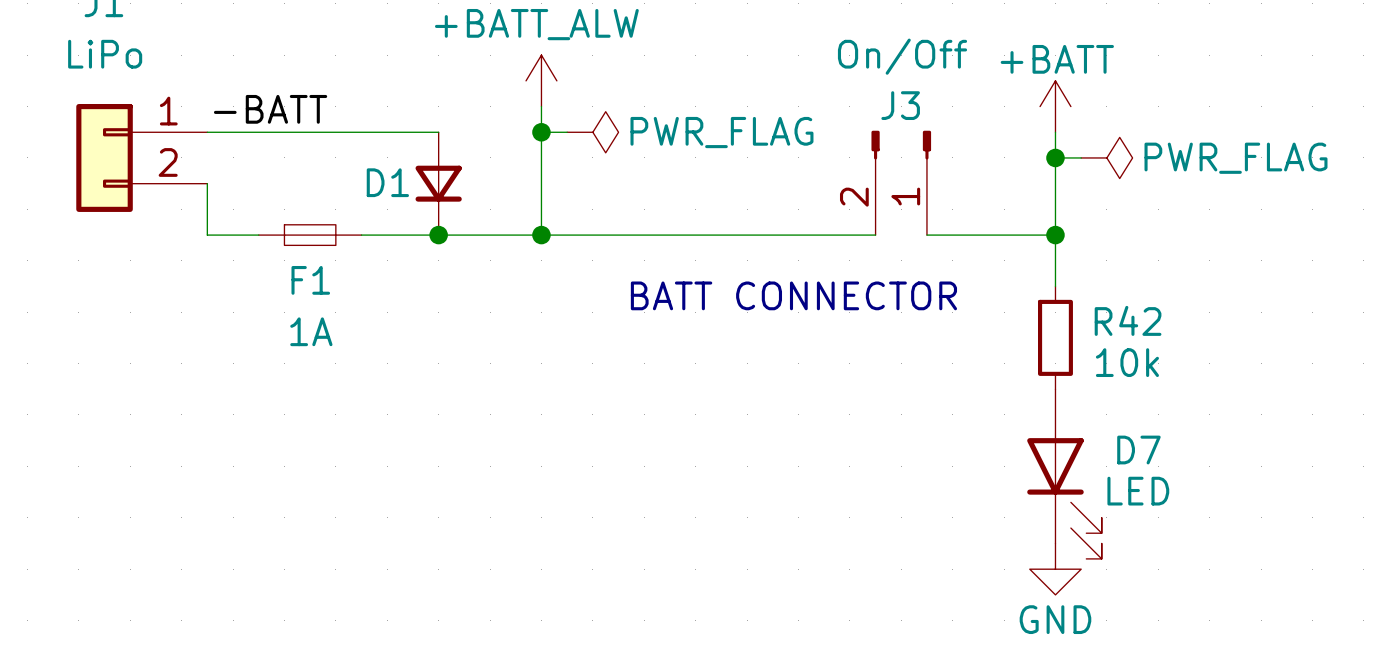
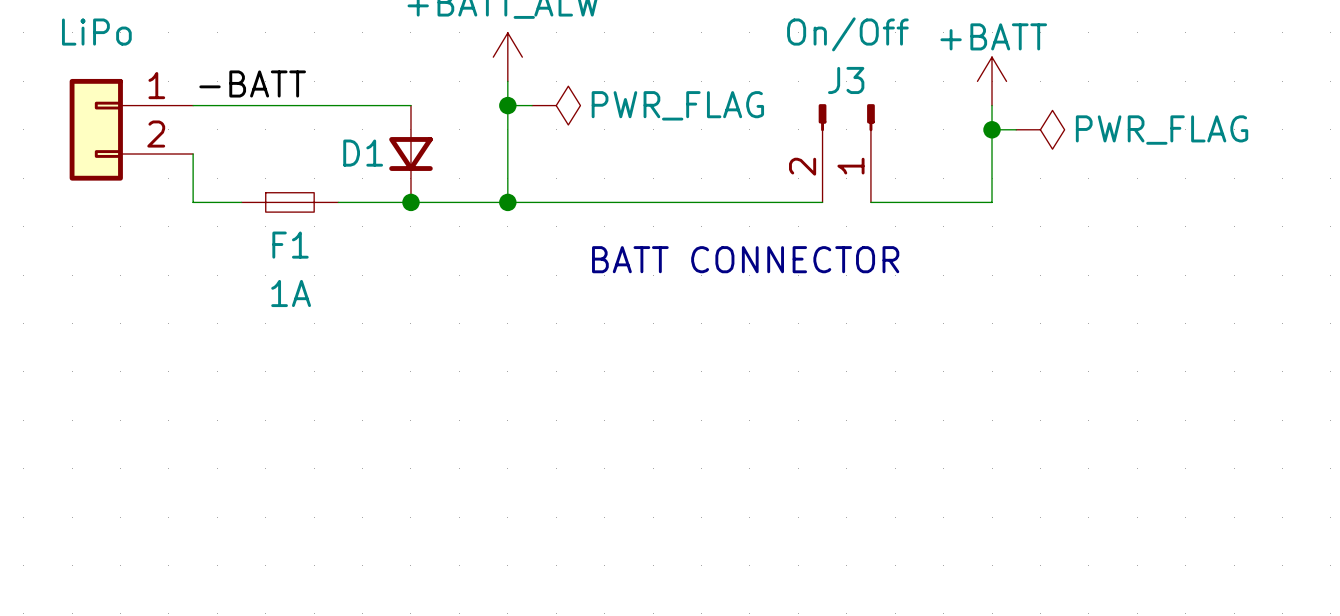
wire: (1055, 235) (1055, 286) -> none
junction: (1055, 235) -> none
R42: 10k (1055, 337) -> none
D7: LED (1064, 474) -> none
power symbol: GND (1055, 569) -> none

